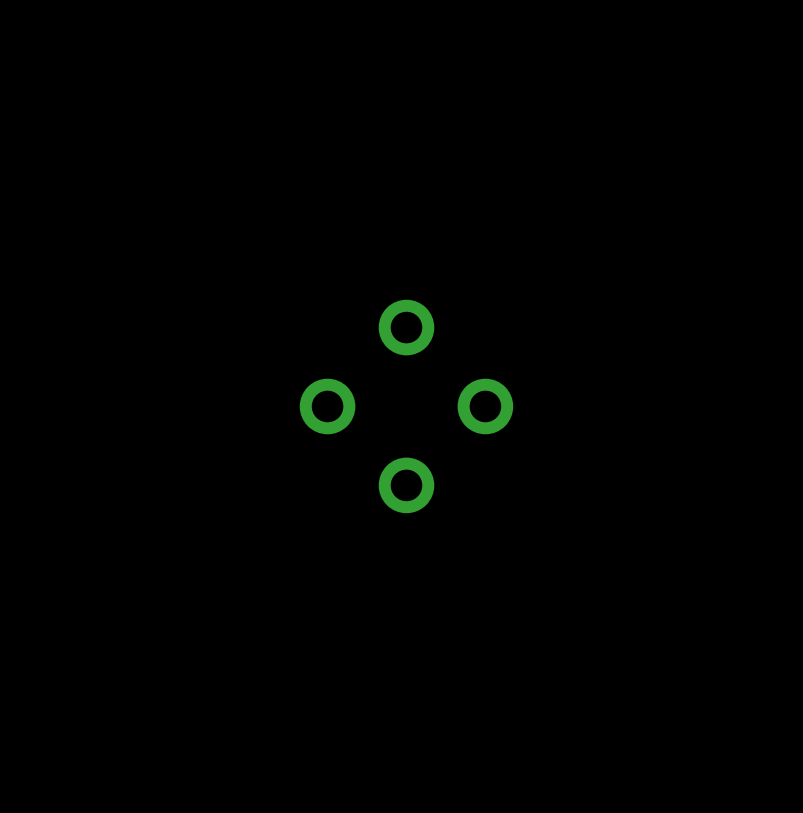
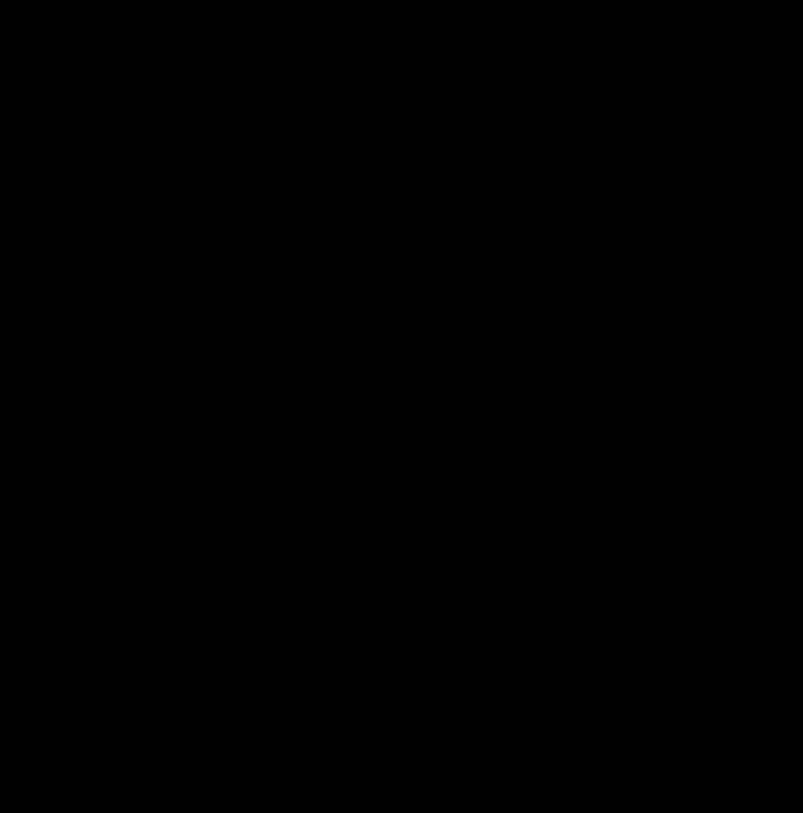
via: (406, 327) -> none
via: (327, 406) -> none
via: (485, 406) -> none
via: (406, 485) -> none

